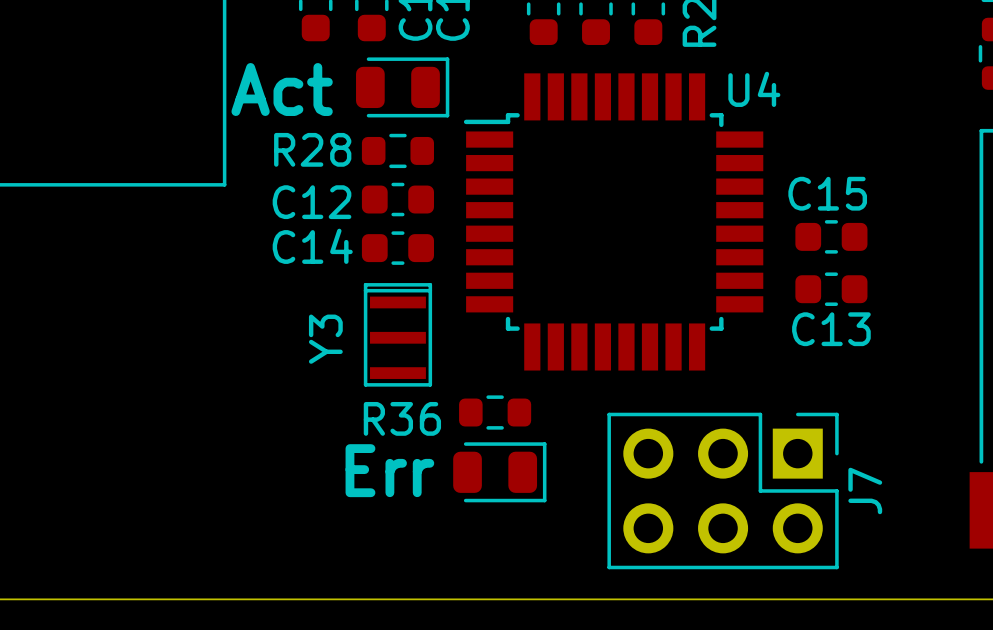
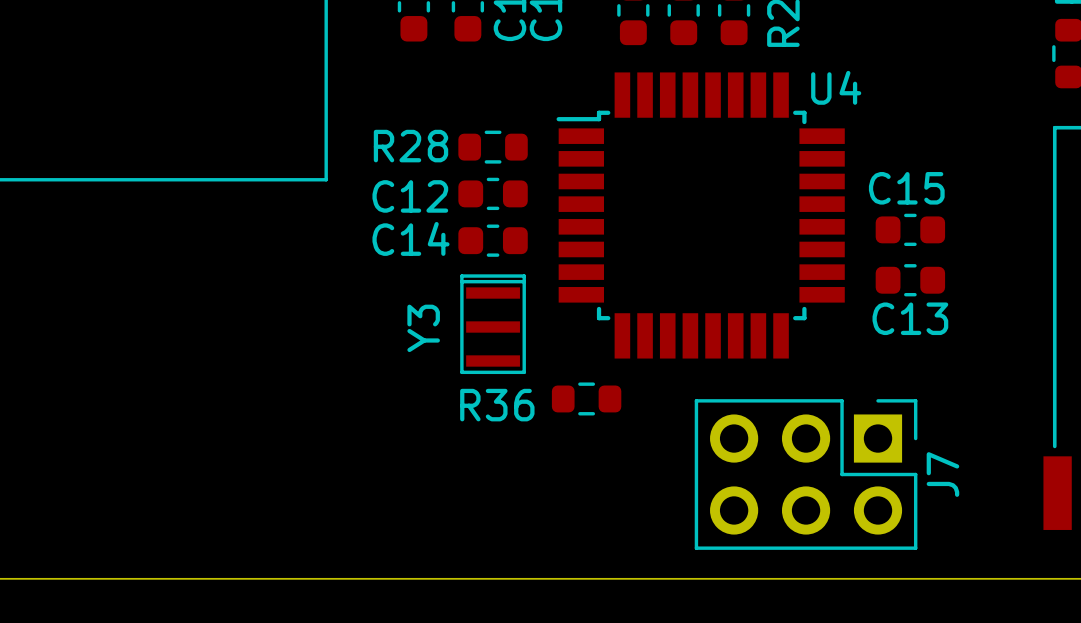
part: (402, 87) -> none
text: Act (282, 89) -> none
text: Err (389, 470) -> none
part: (499, 472) -> none

